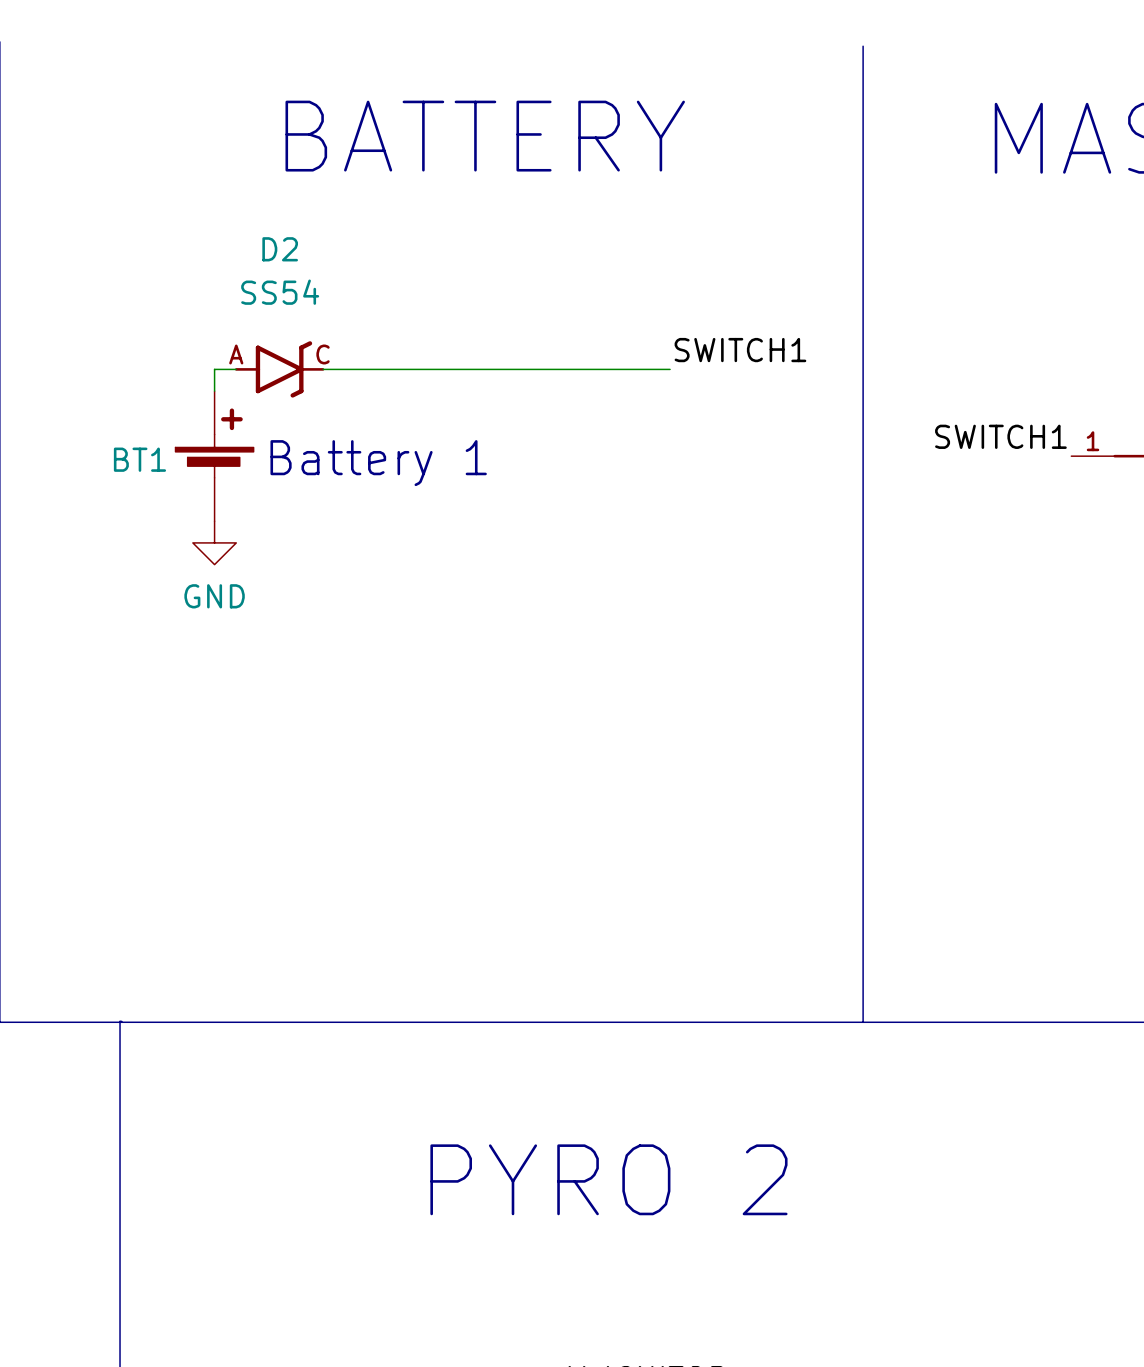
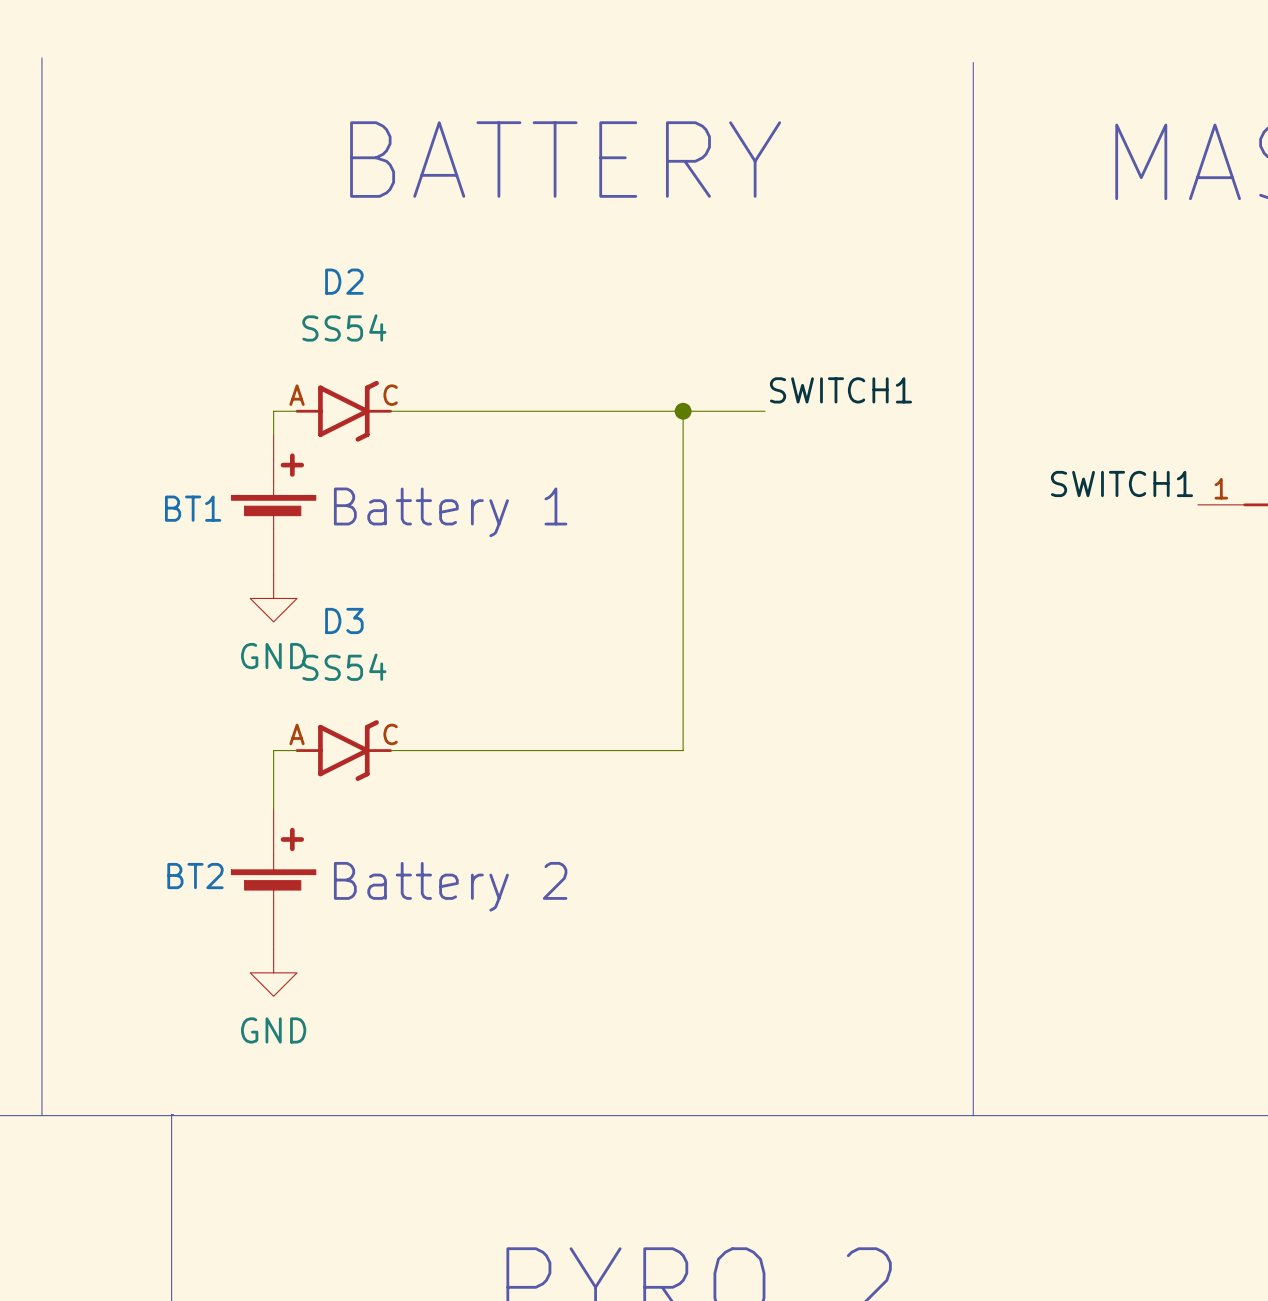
wire: none -> (683, 411) (683, 750) (390, 750)
junction: none -> (683, 411)
wire: none -> (297, 750) (273, 750) (273, 809)
D3: none -> SS54 (343, 750)
BT2: none -> (273, 879)
text: none -> Battery 2 (450, 886)
power symbol: none -> GND (273, 972)

